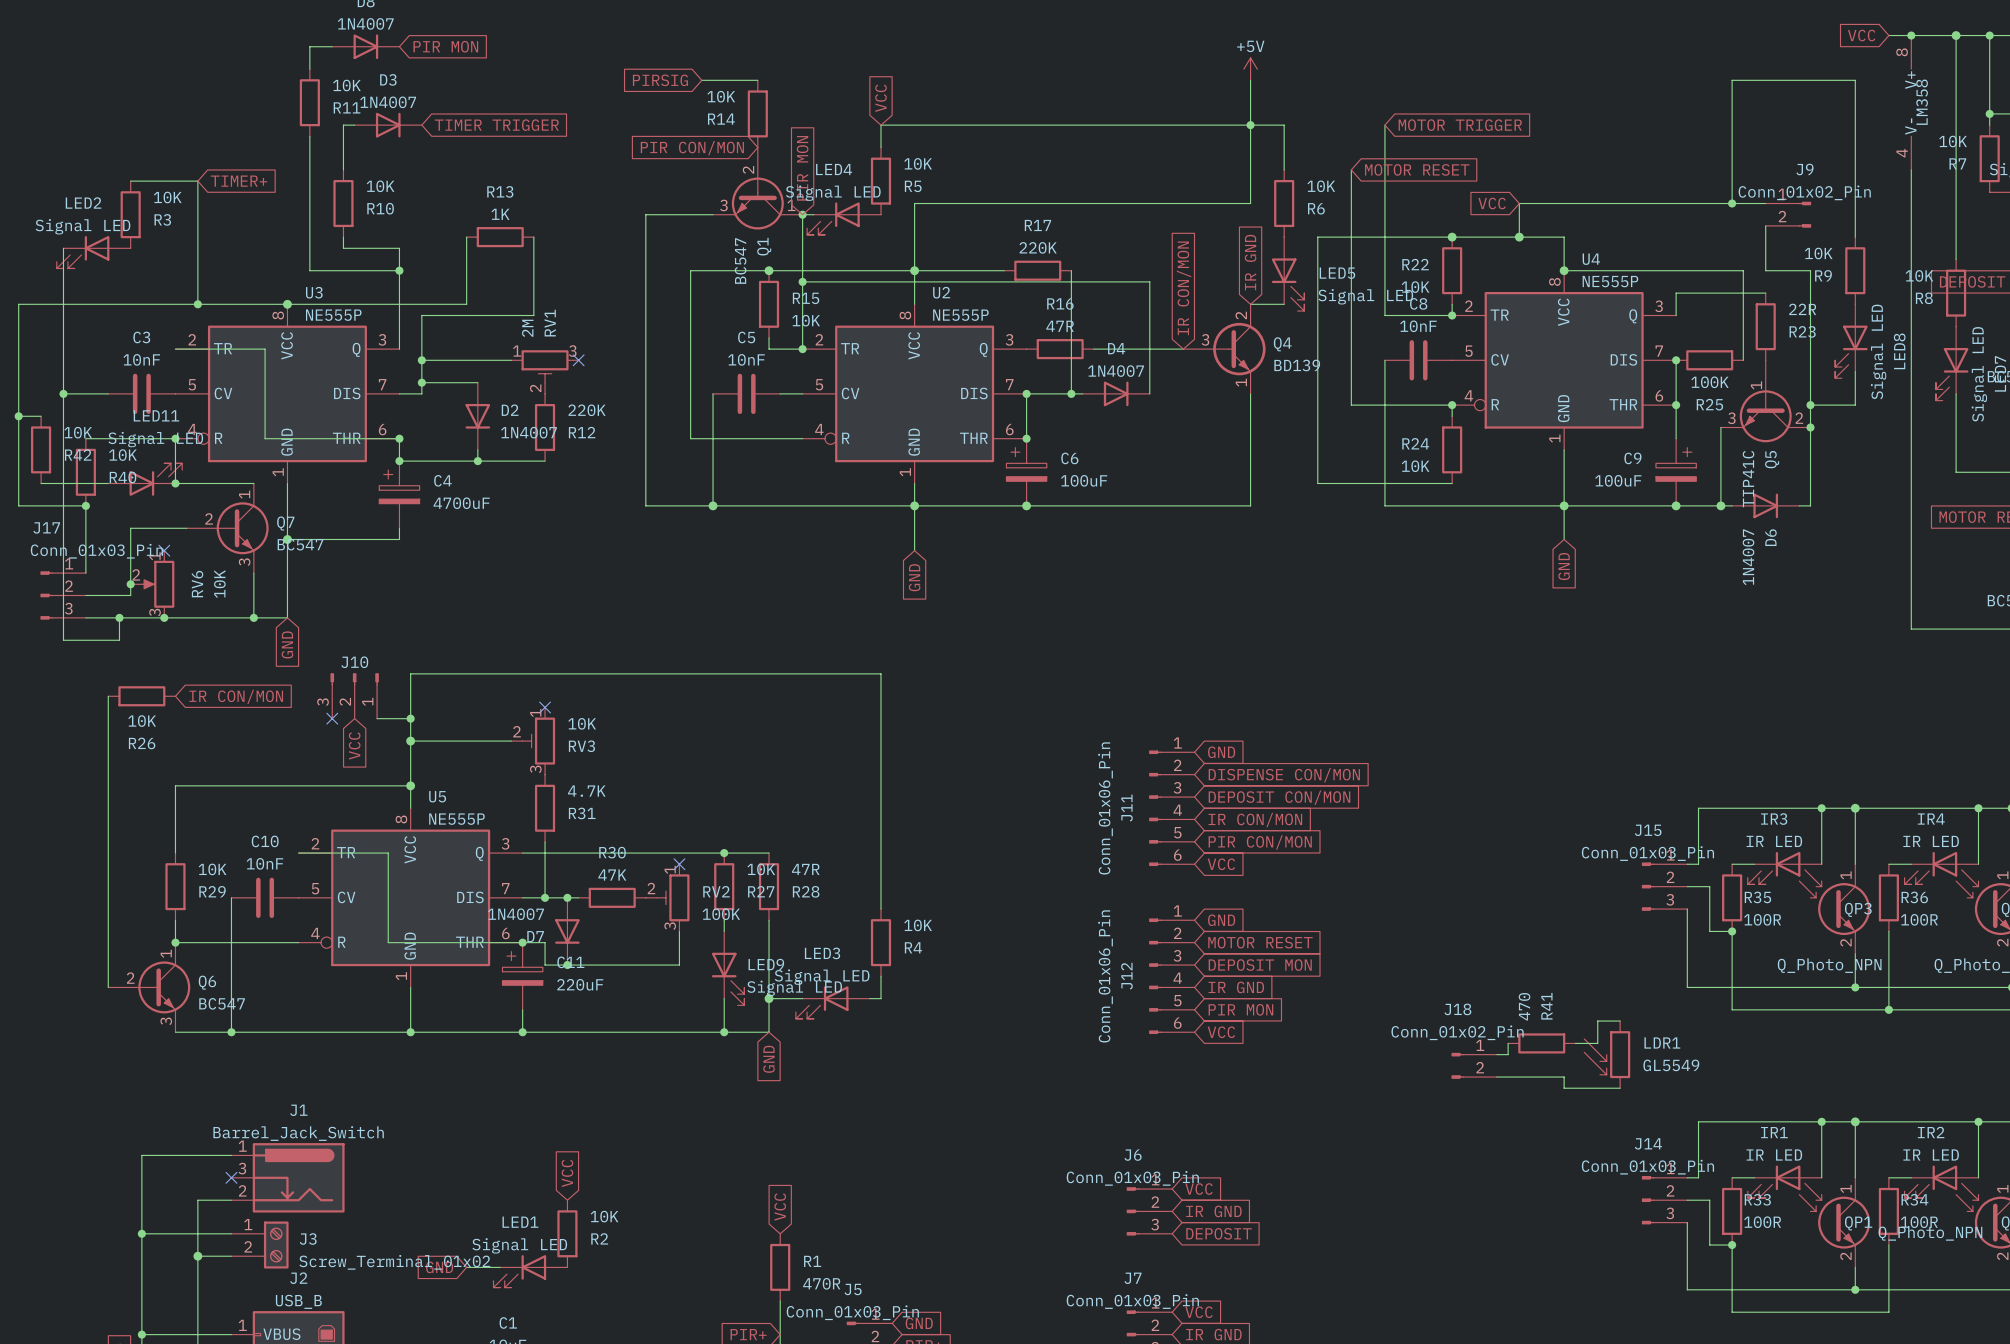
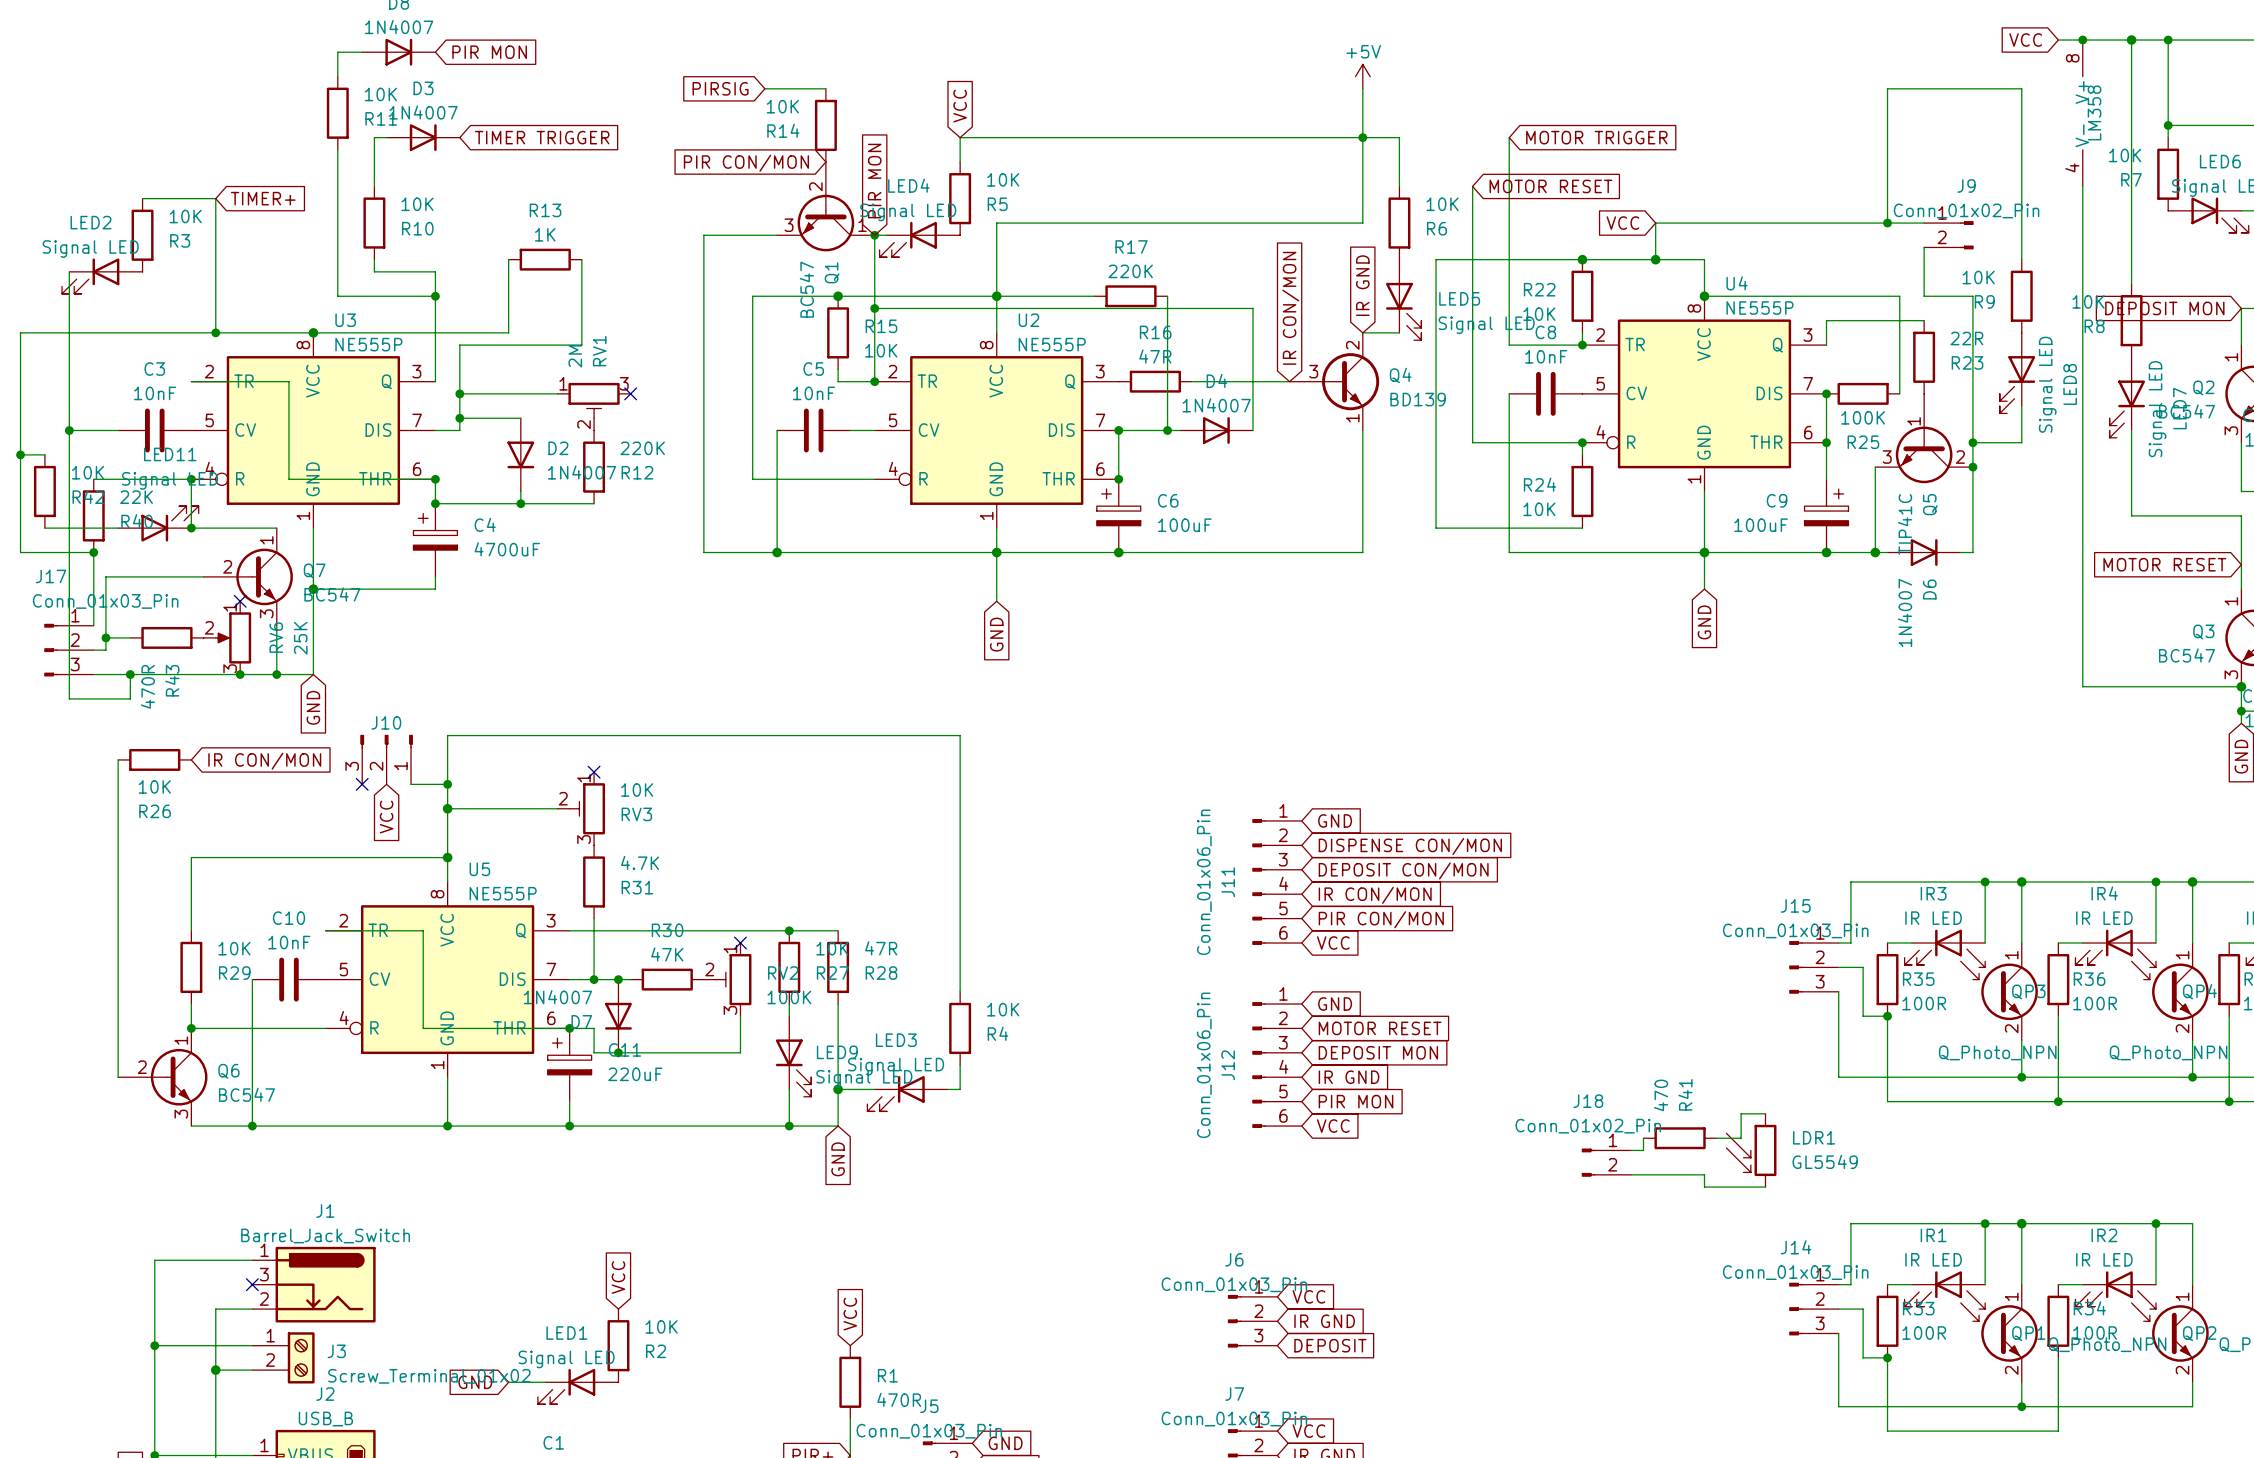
R40 value: 10K (122, 455) -> 22K (136, 497)
wire: (130, 528) (130, 595) (97, 595) -> (142, 576) (105, 576) (105, 650)
no-connect mark: (164, 550) -> none
no-connect mark: none -> (240, 601)
wire: none -> (105, 637) (130, 637)
junction position: (130, 584) -> (105, 637)
RV6 position: (152, 584) -> (227, 637)
R43: none -> 470R (166, 637)
RV6 value: 10K (219, 584) -> 25K (300, 638)
junction: (164, 617) -> none
junction: none -> (240, 674)

